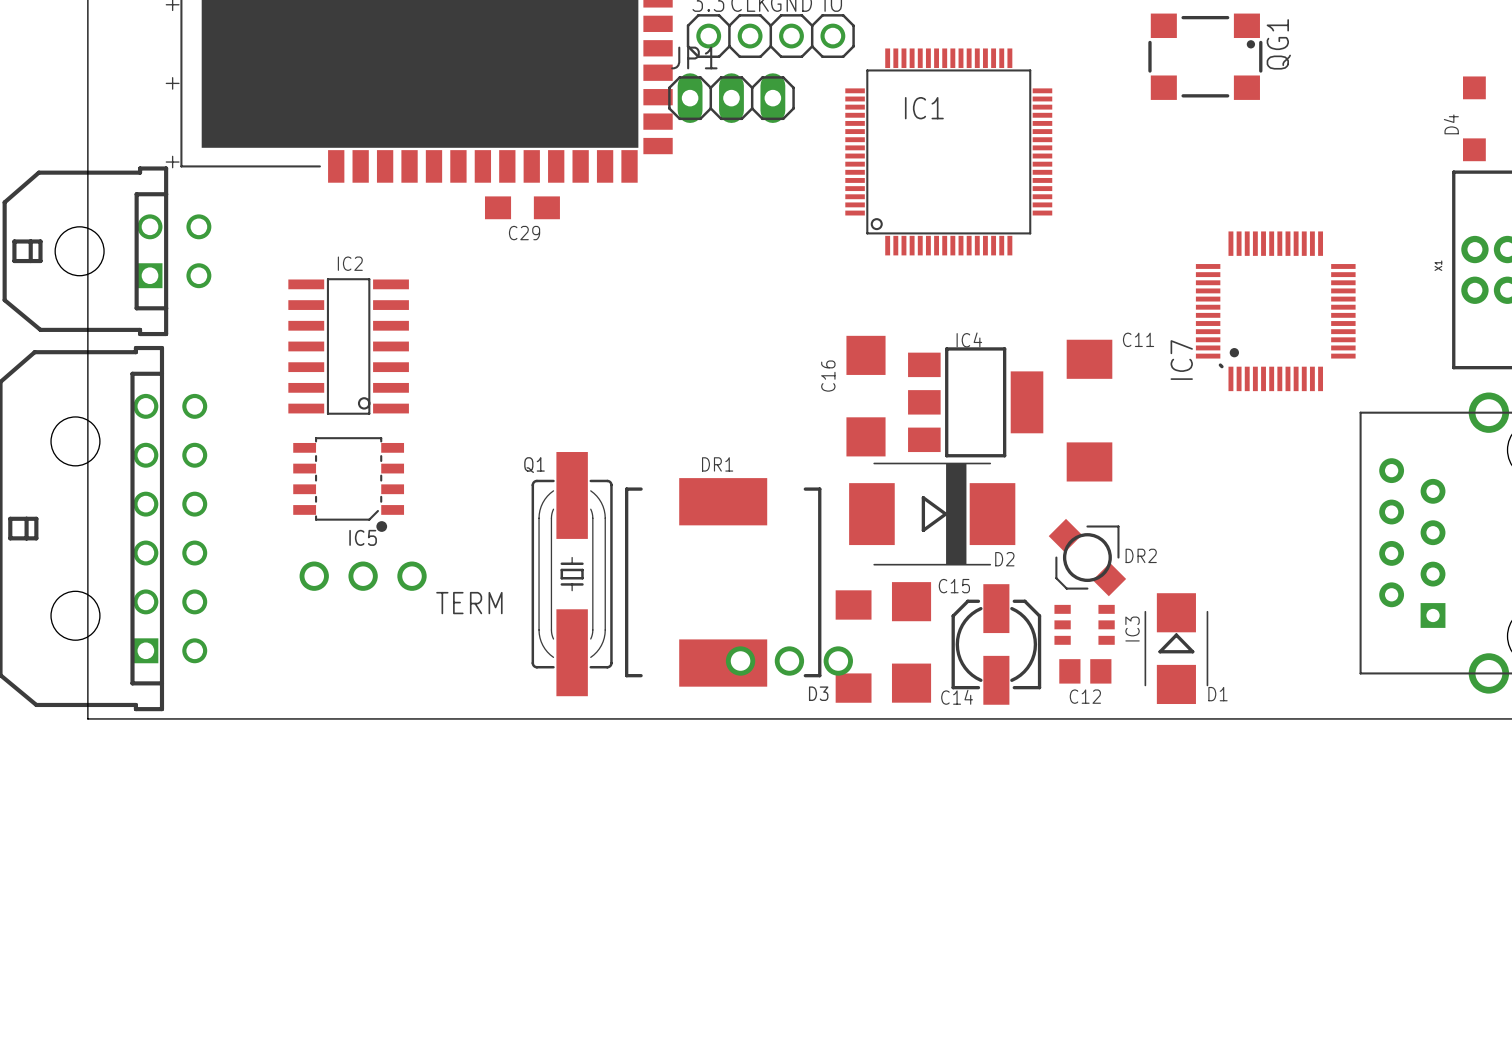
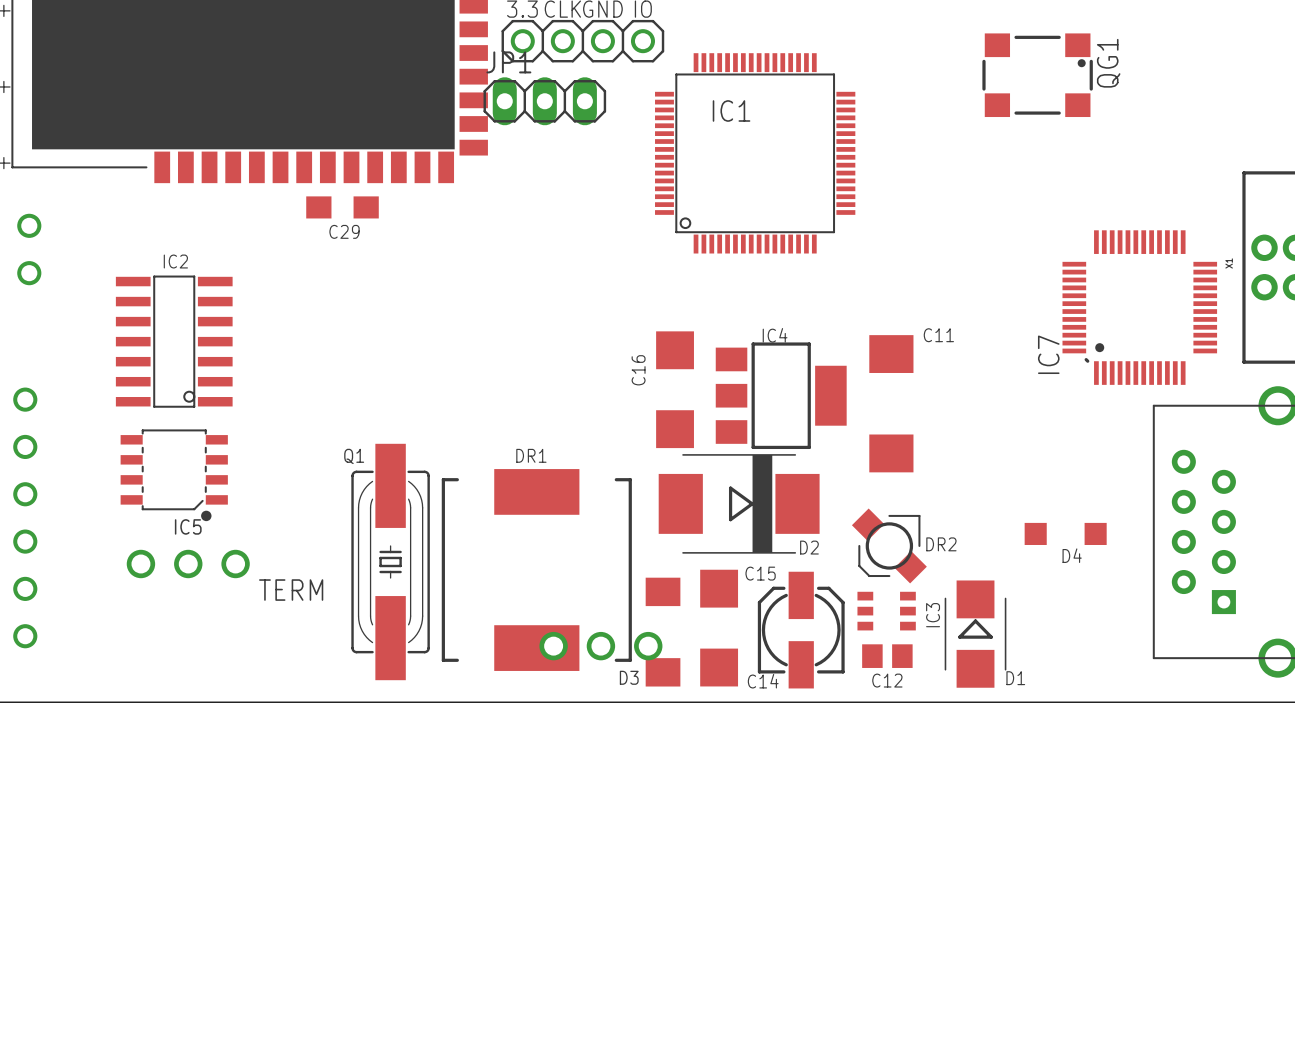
QG1 position: (1205, 56) -> (1037, 75)
D4 rotation: 0° (1474, 118) -> 90° clockwise (1065, 533)
D4 position: (1474, 118) -> (1065, 533)
D4 name position: D4 (1451, 124) -> D4 (1072, 555)
IC7 position: (1275, 311) -> (1139, 307)

